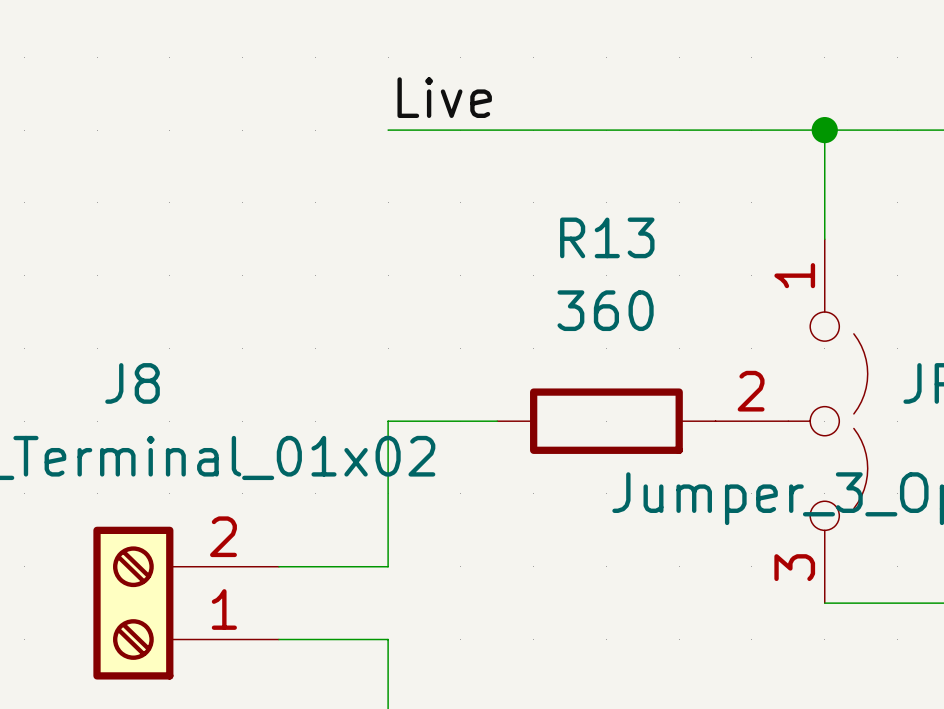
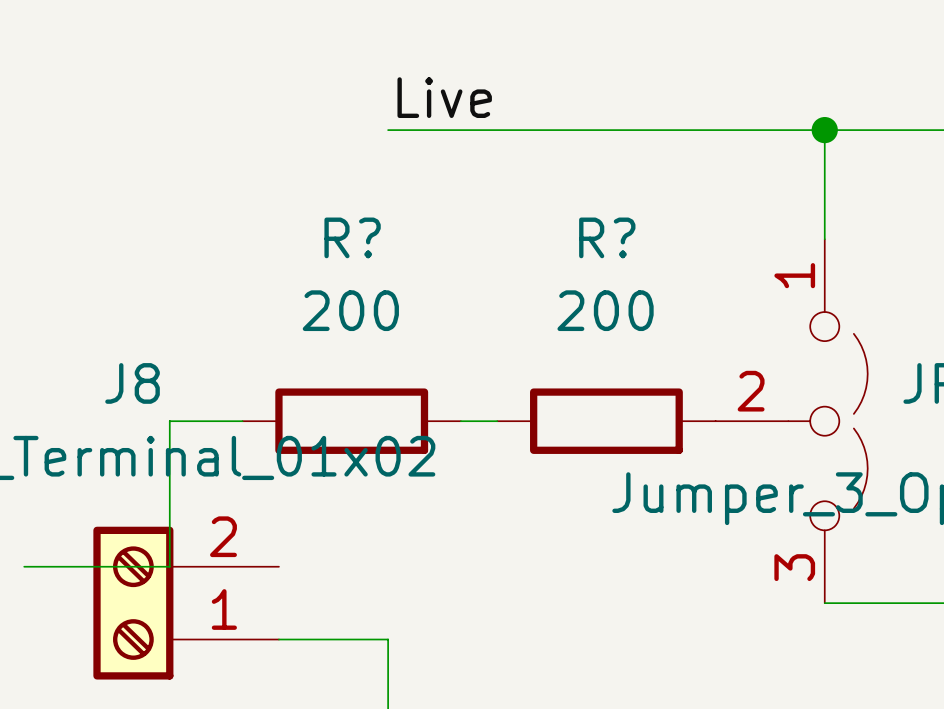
R13 name: R13 (607, 237) -> R? (607, 237)
R13 value: 360 (605, 310) -> 200 (605, 310)
wire: none -> (242, 421) (169, 421) (169, 566) (24, 566)
R?: none -> 200 (351, 421)
wire: (460, 421) (388, 421) (388, 566) (278, 566) -> none

